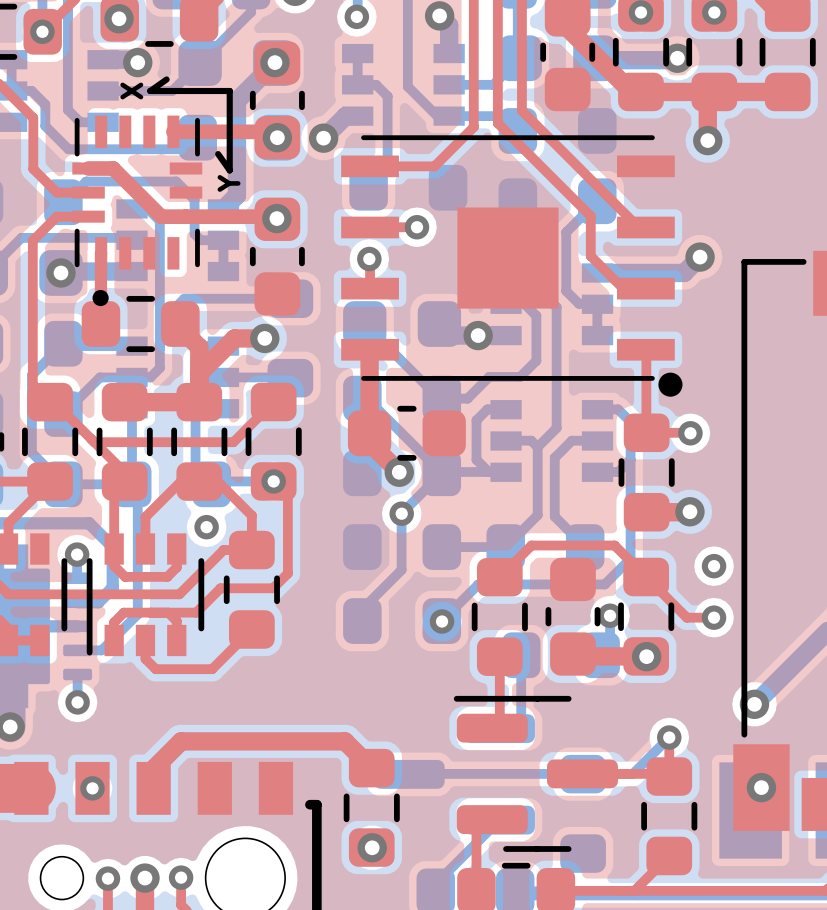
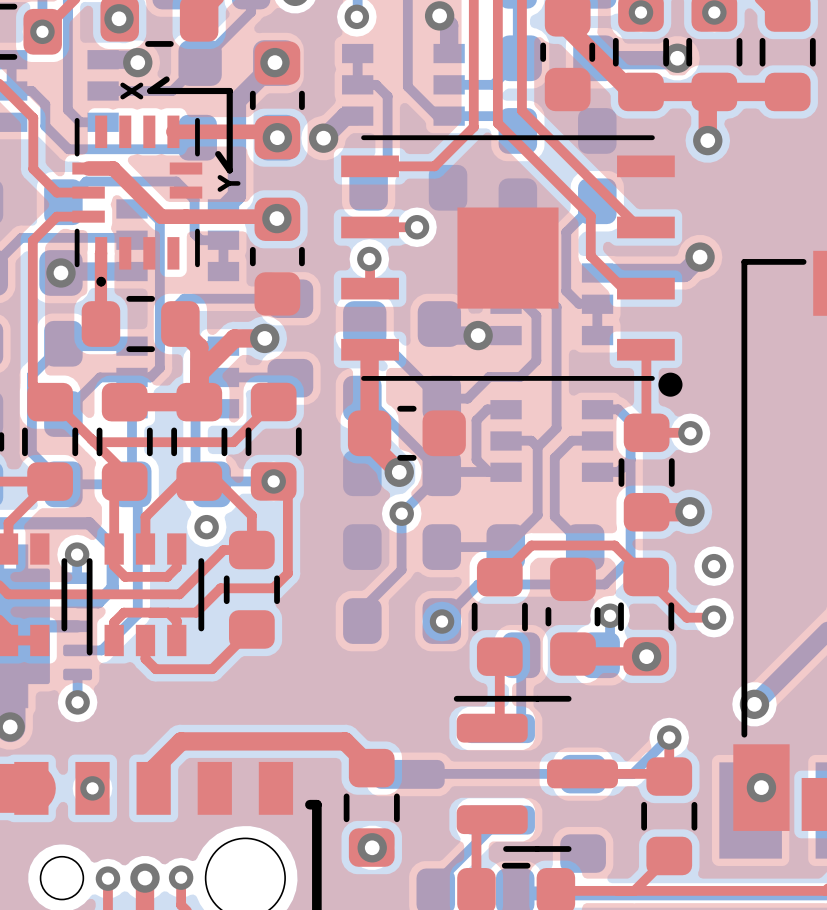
part footprint: [72, 115, 203, 307] -> [72, 115, 203, 287]

